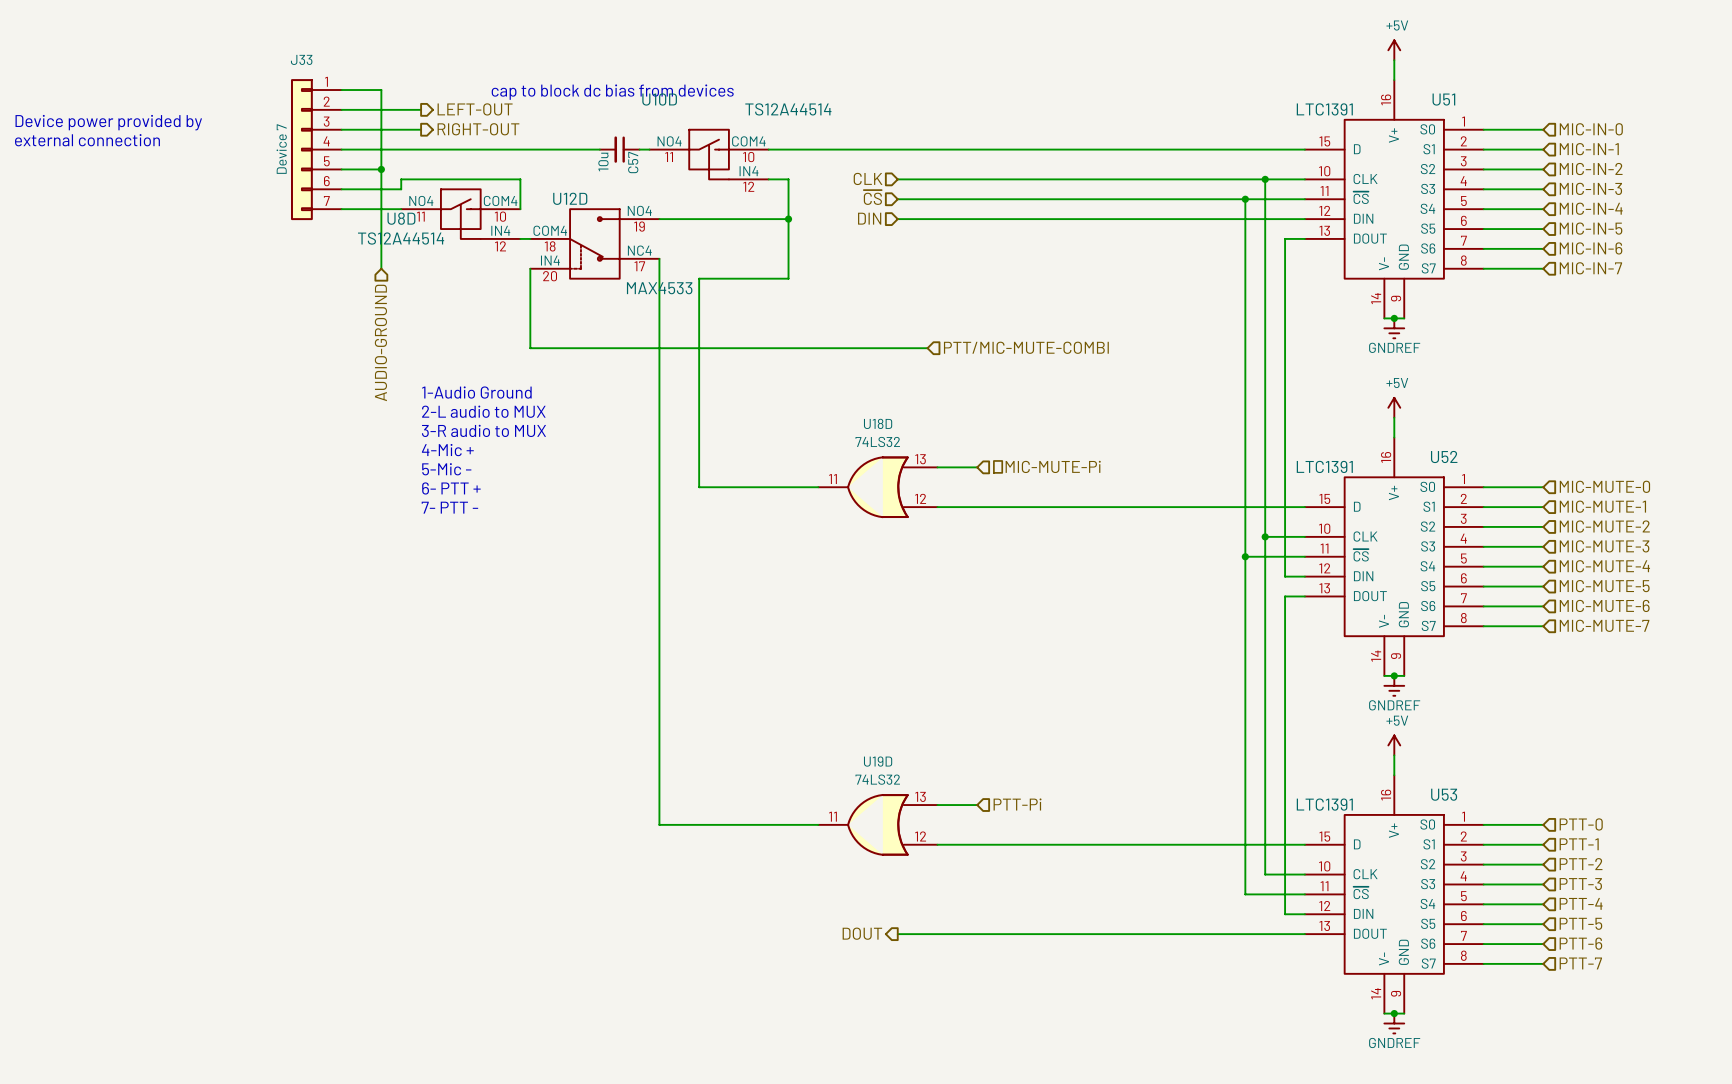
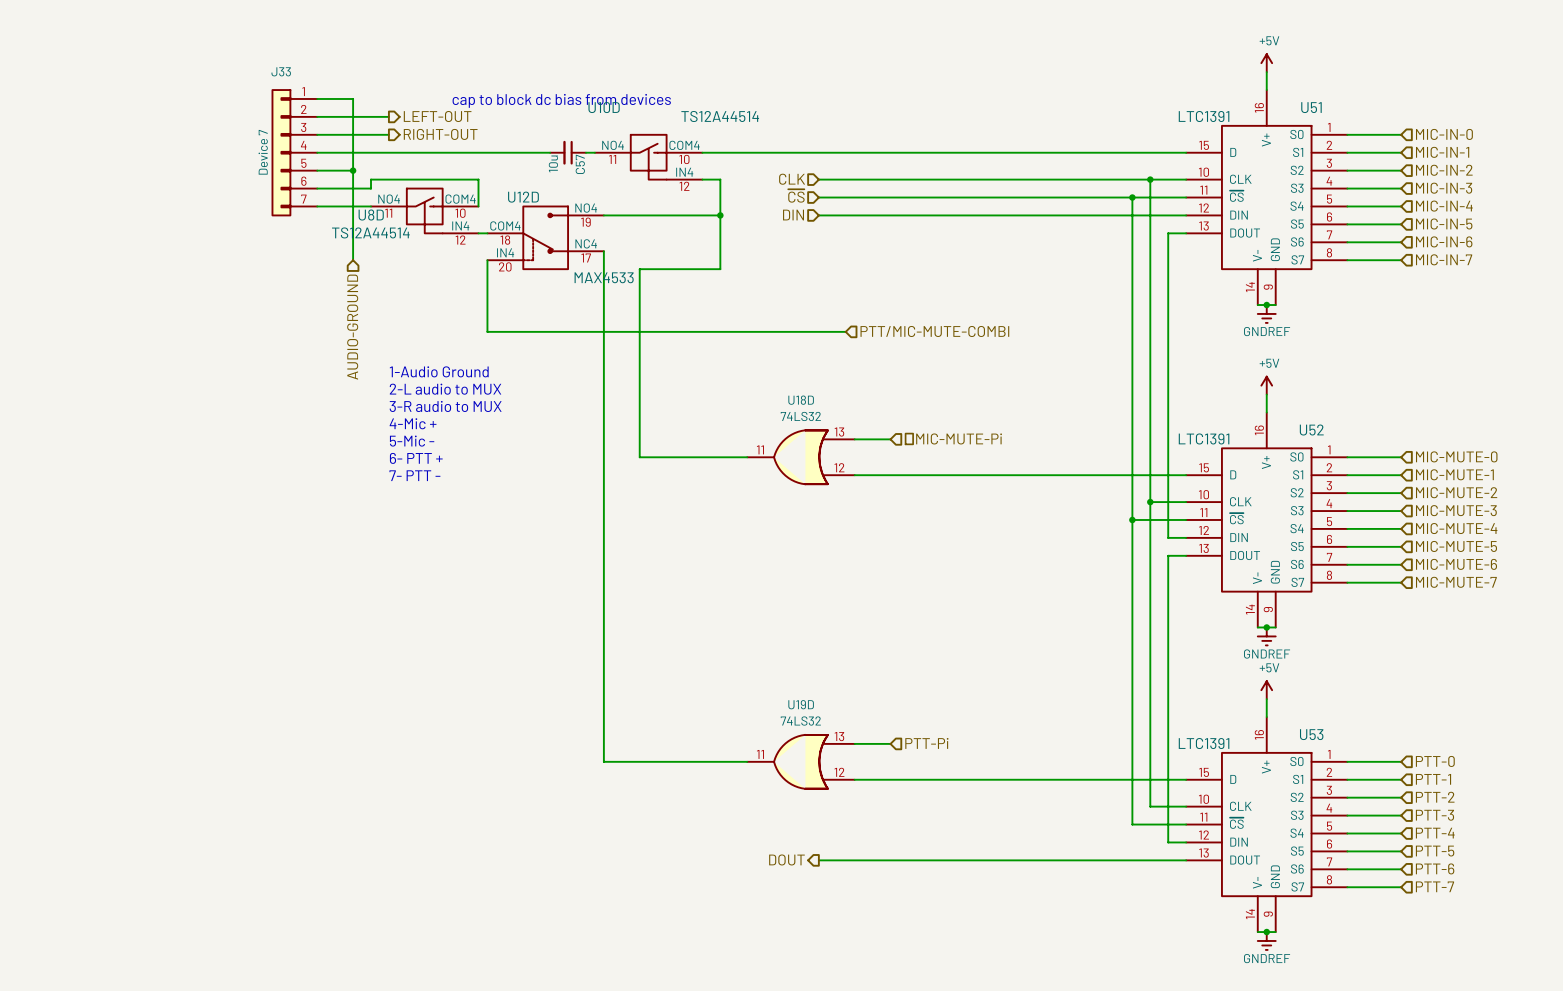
text: Device power provided by (108, 122) -> none
text: external connection (87, 140) -> none

